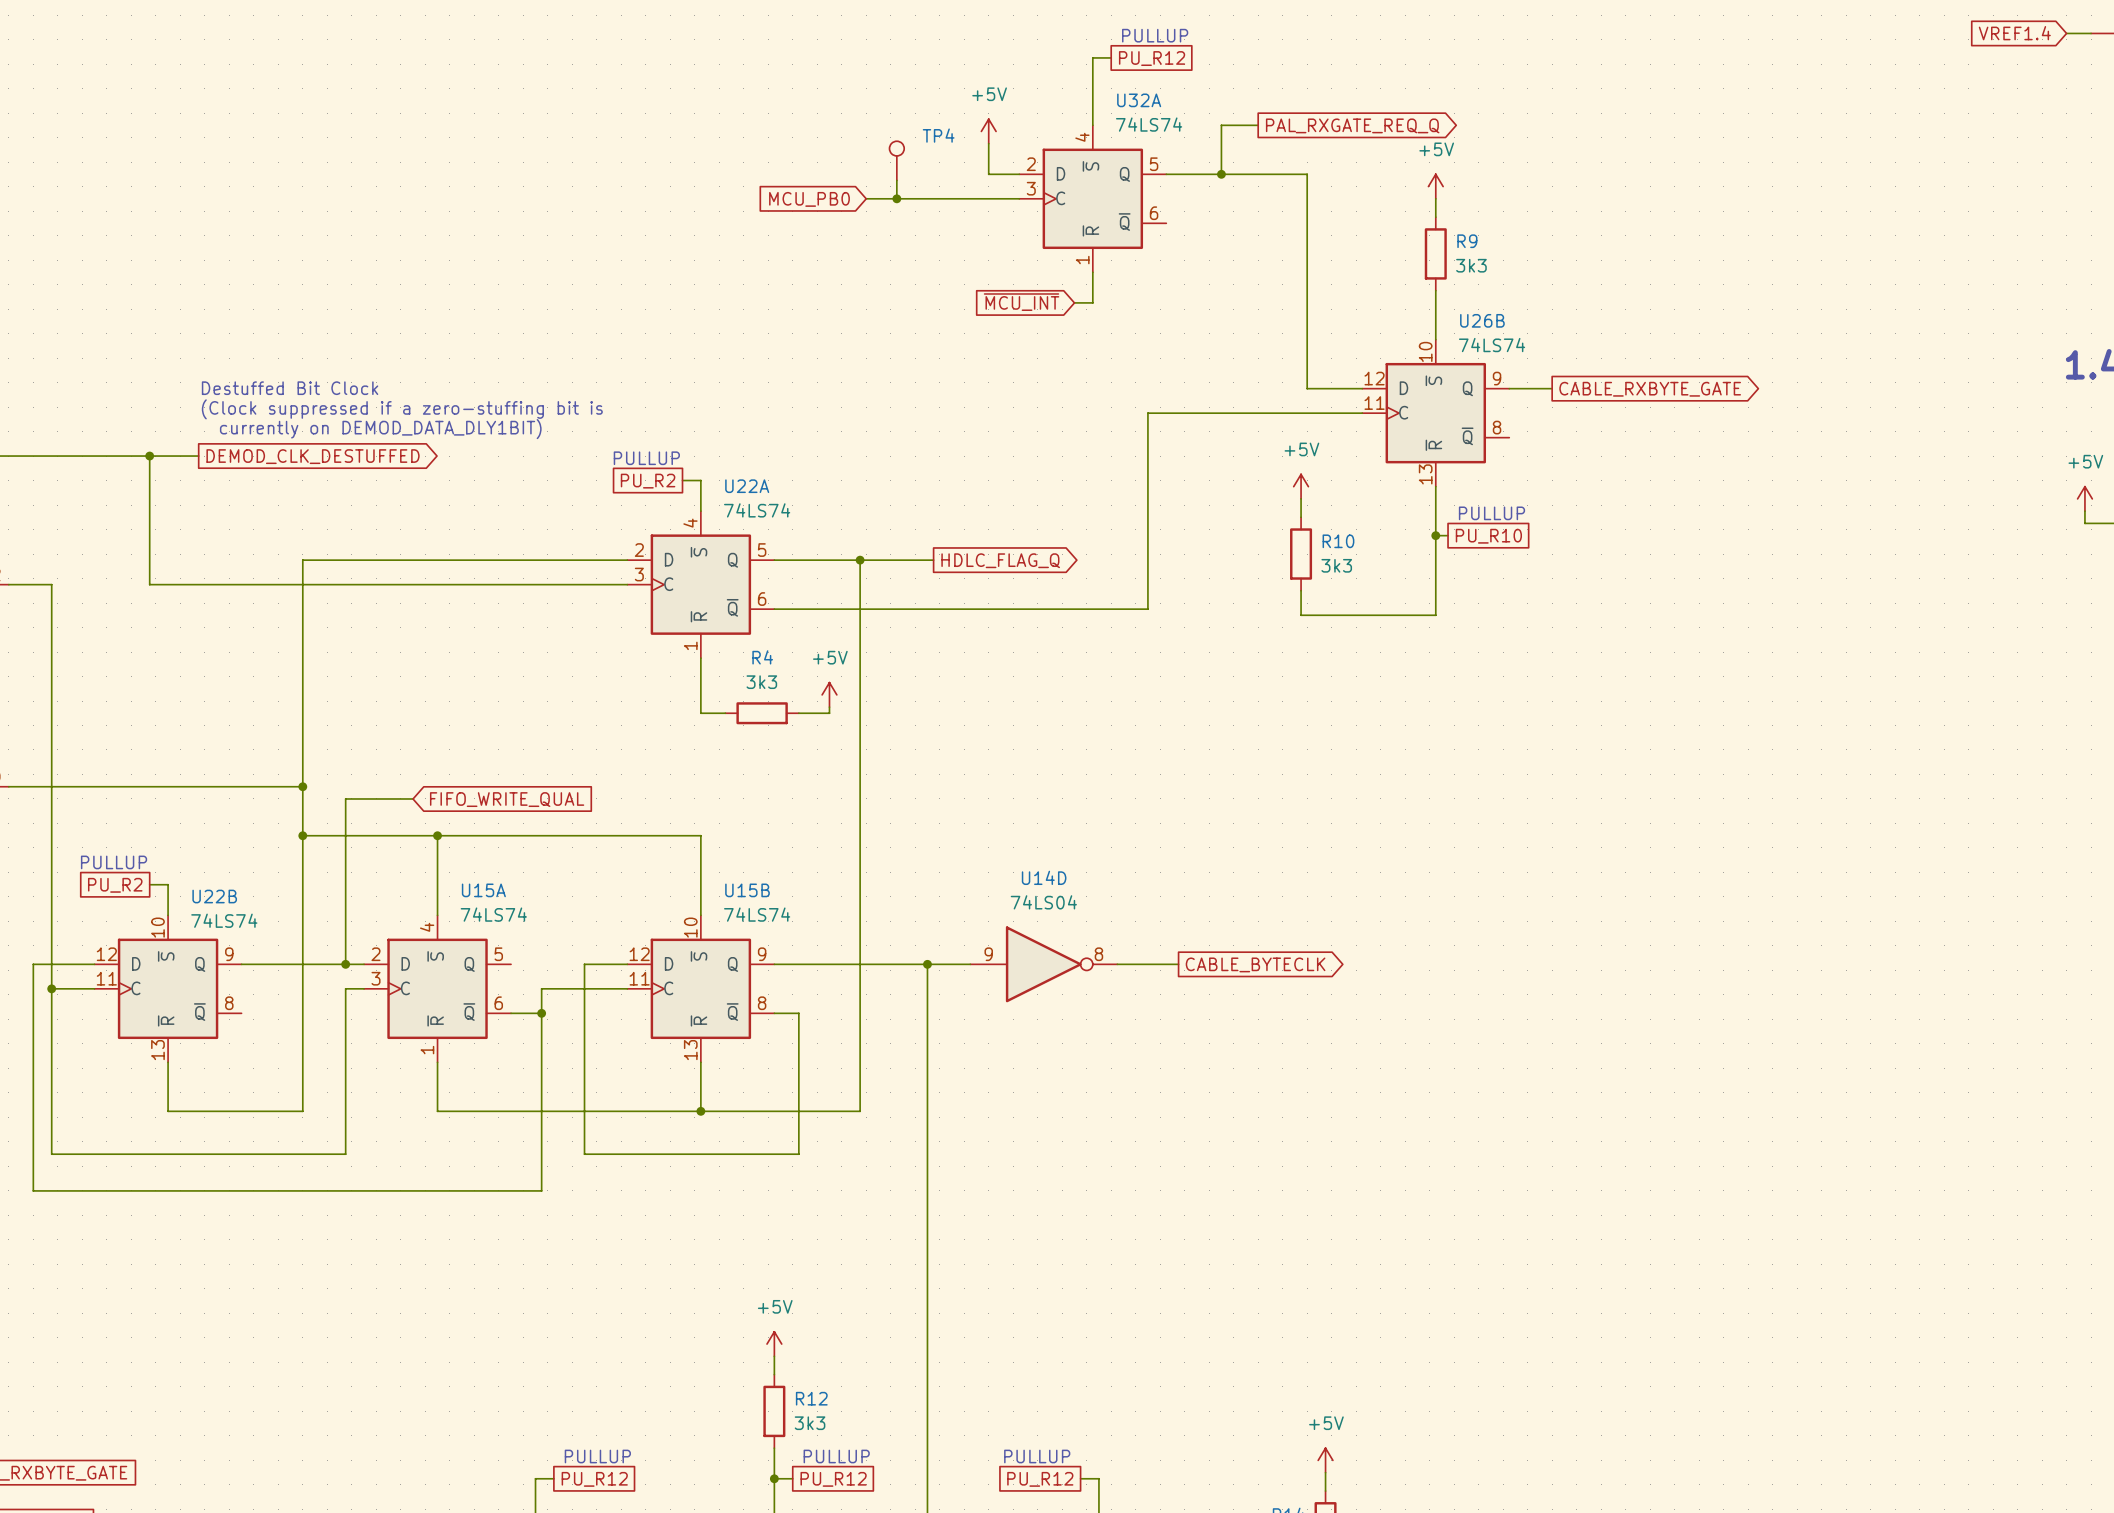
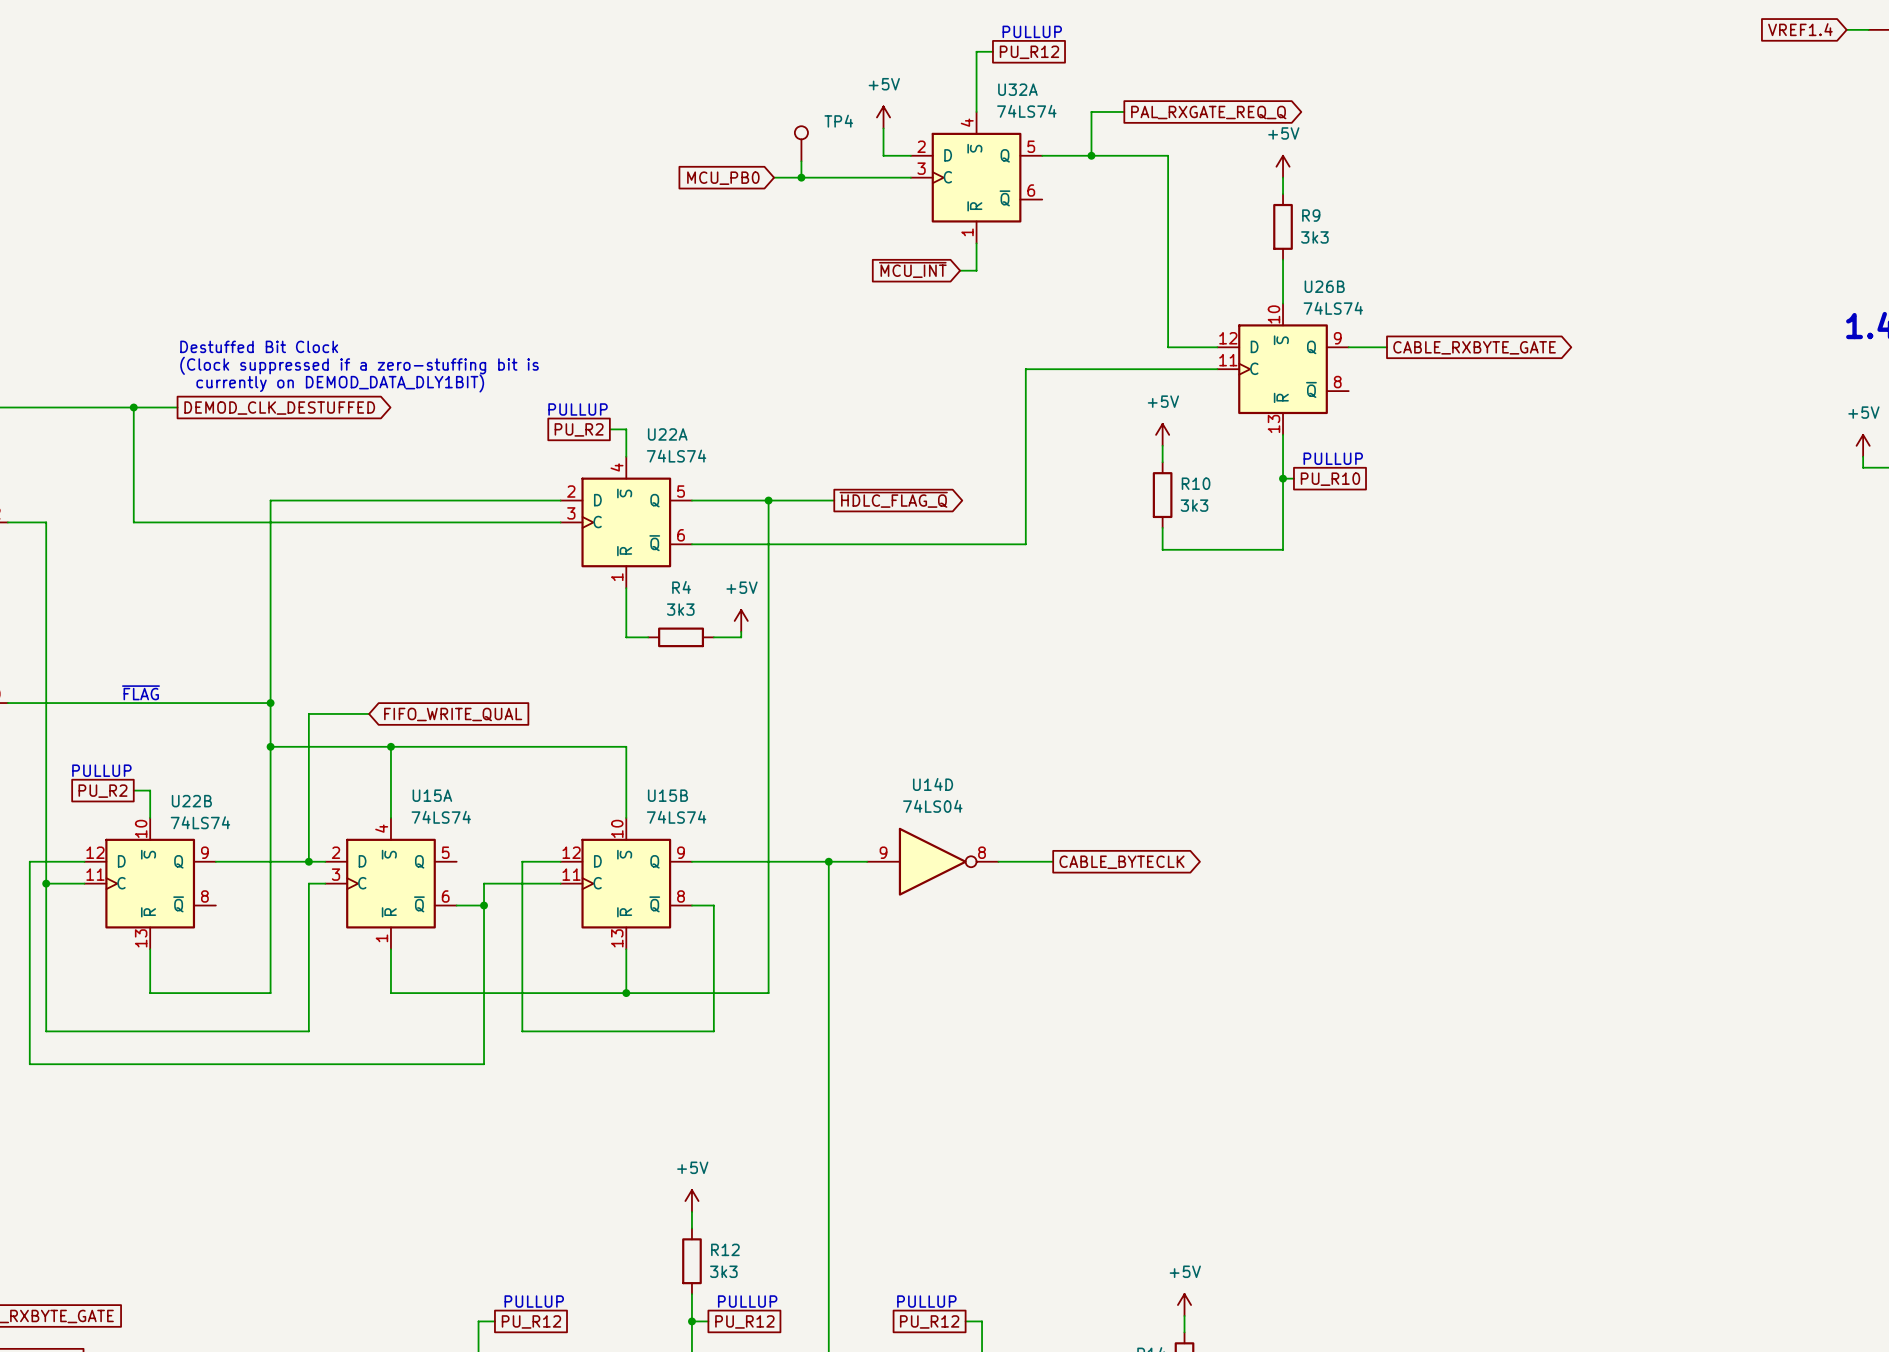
global label: HDLC_FLAG_Q (1000, 560) -> ~{HDLC_FLAG_Q} (893, 499)
text: none -> ~{FLAG} (140, 692)

